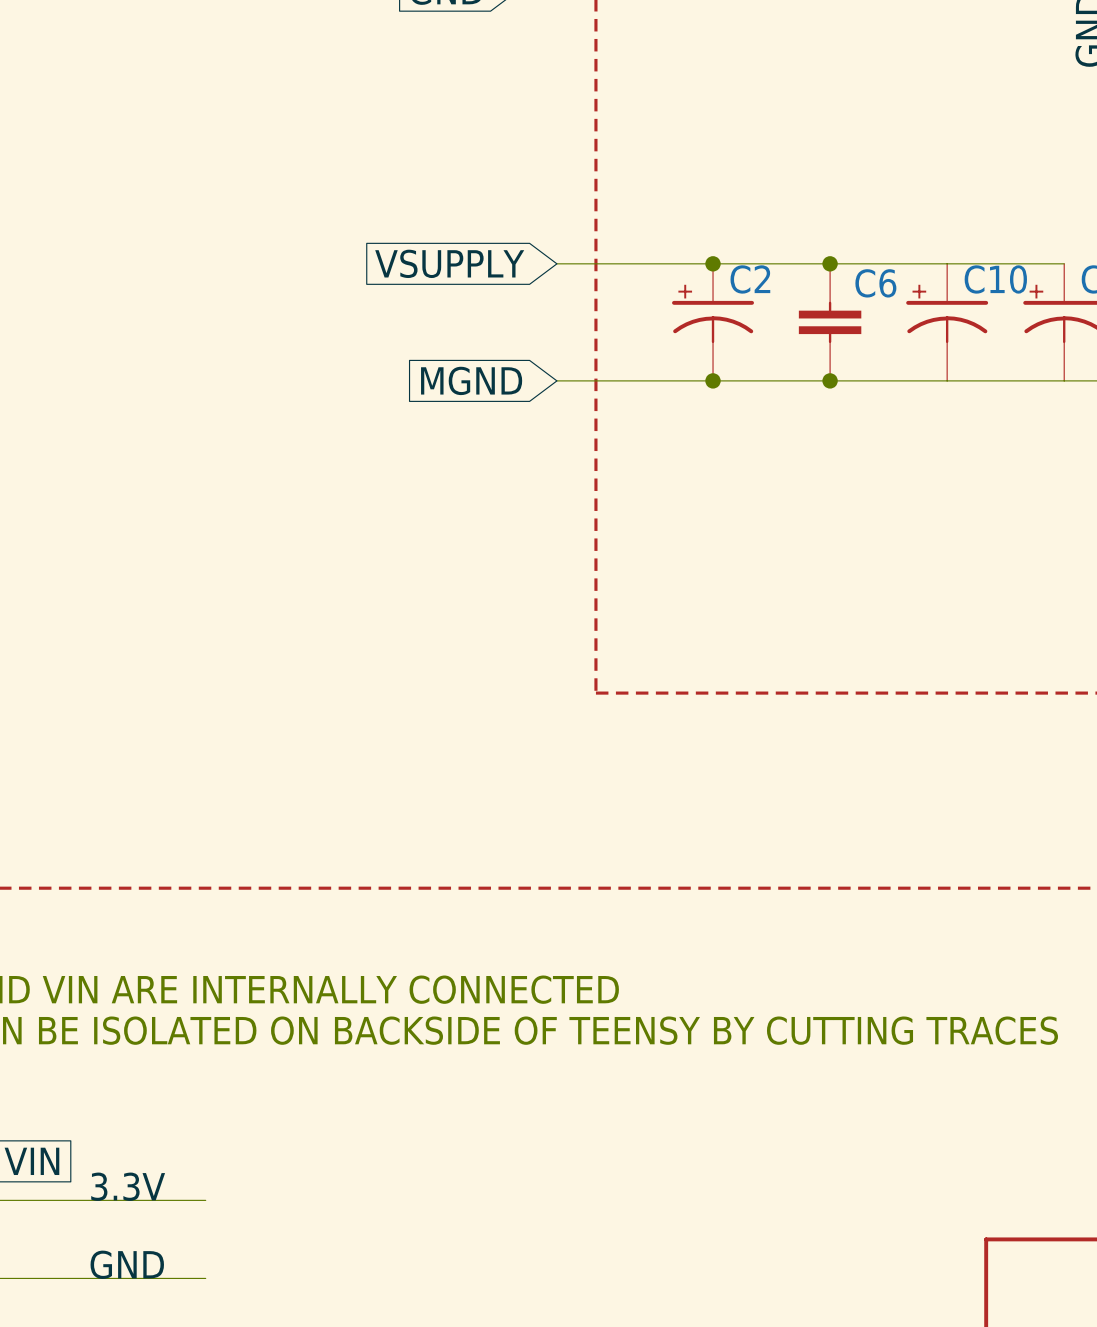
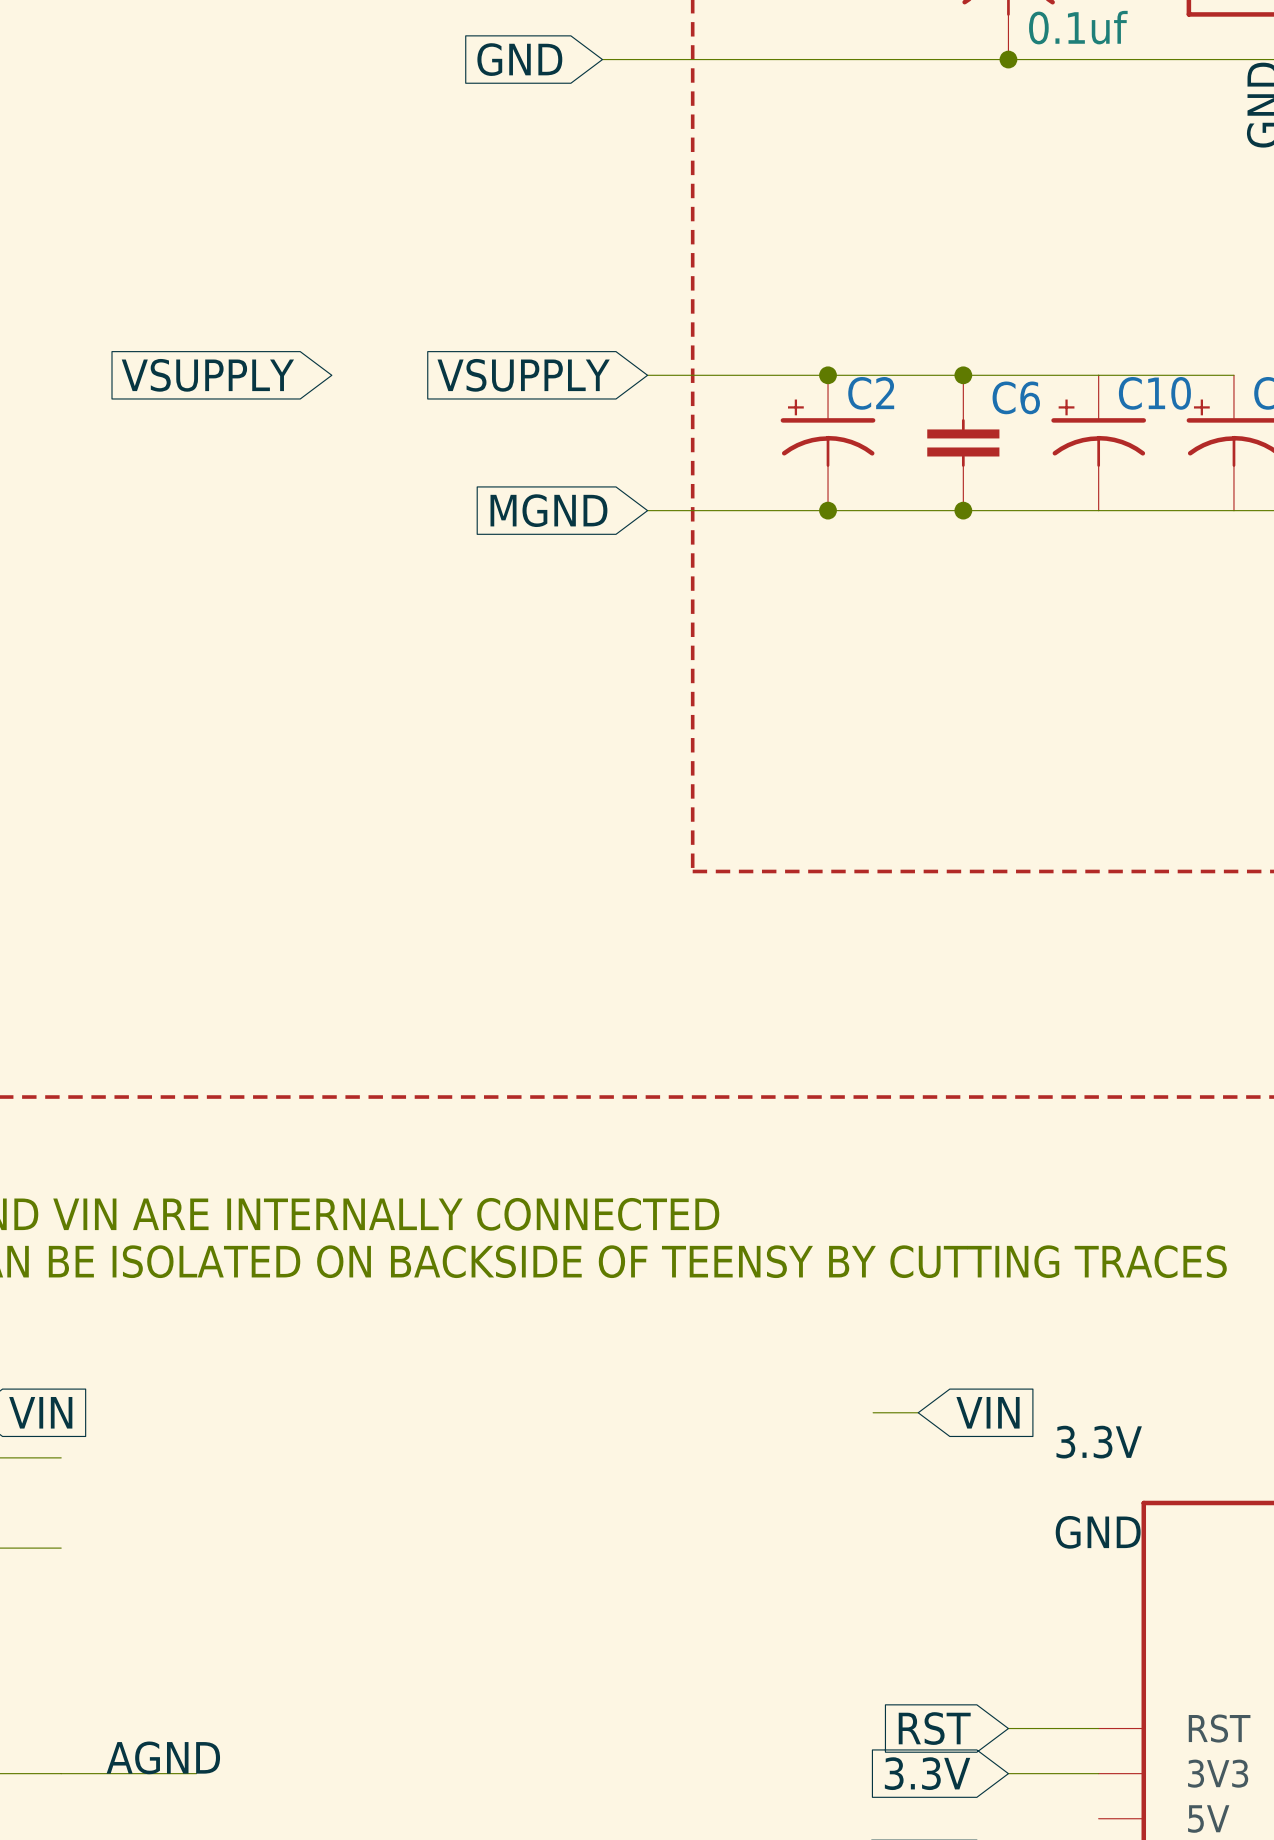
global label: none -> VSUPPLY (207, 375)
wire: none -> (873, 1412) (918, 1412)
global label: none -> VIN (988, 1412)
label: 3.3V (128, 1186) -> none
label: none -> 3.3V (1099, 1442)
wire: (49, 1200) (205, 1200) -> none
label: GND (127, 1264) -> none
label: none -> GND (1098, 1532)
wire: (49, 1278) (205, 1278) -> none

